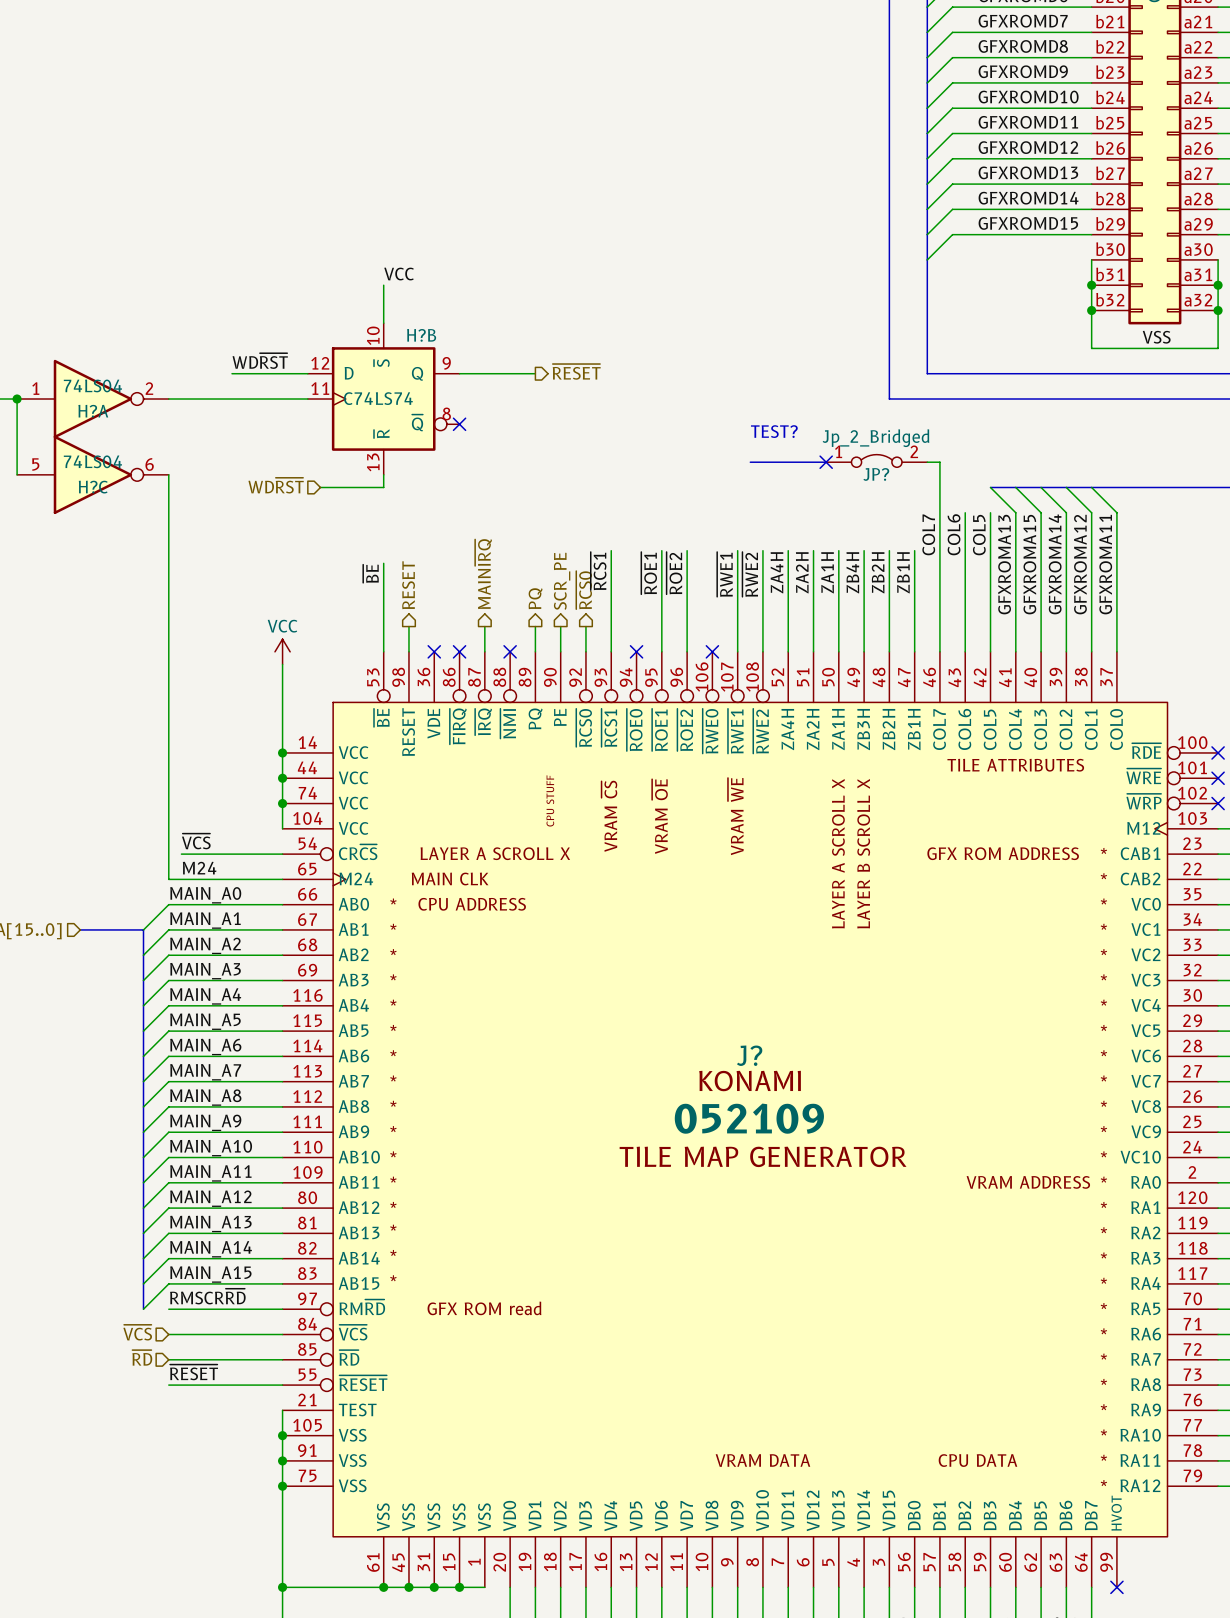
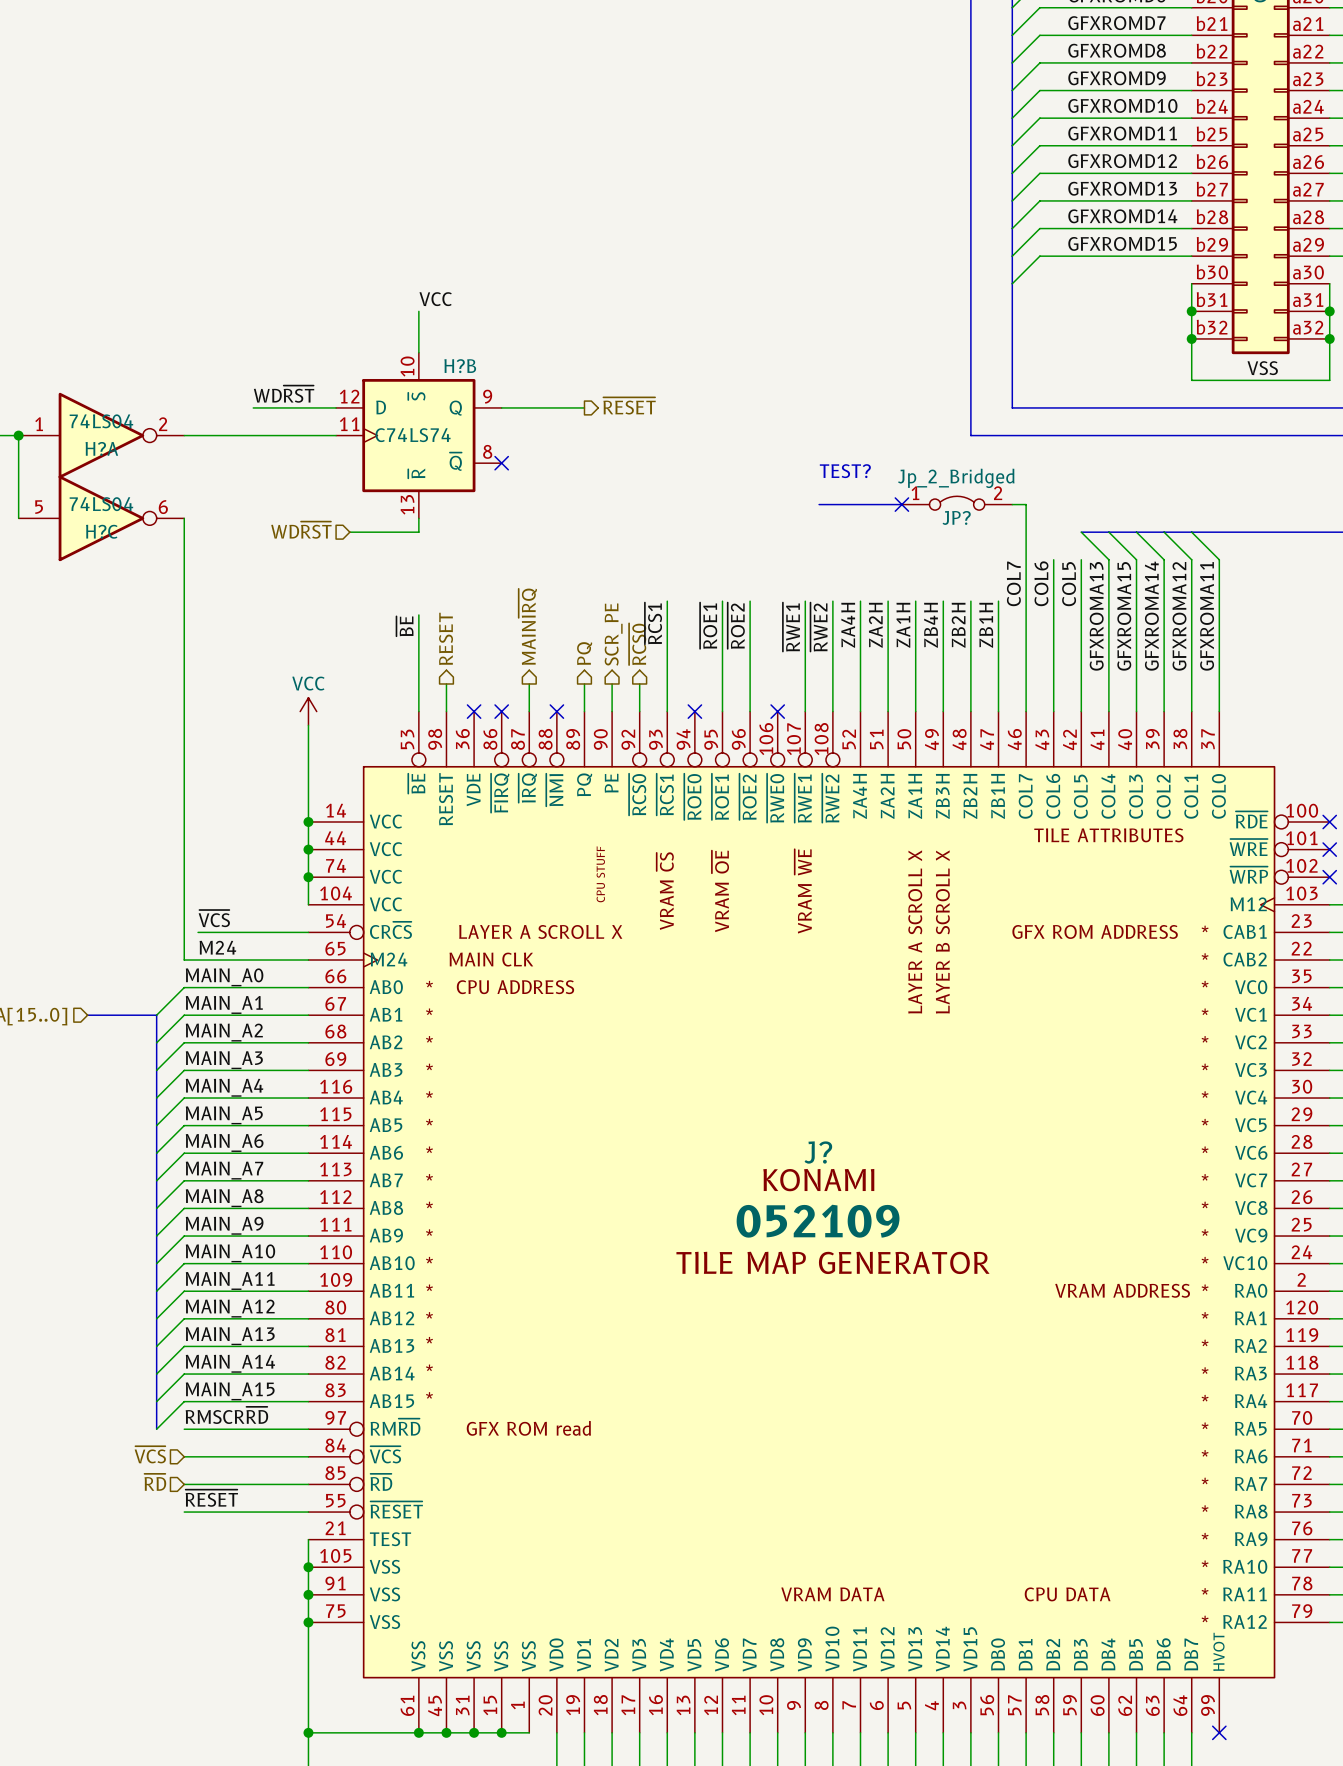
H?B symbol: [307, 323, 460, 475] -> [336, 352, 502, 519]

